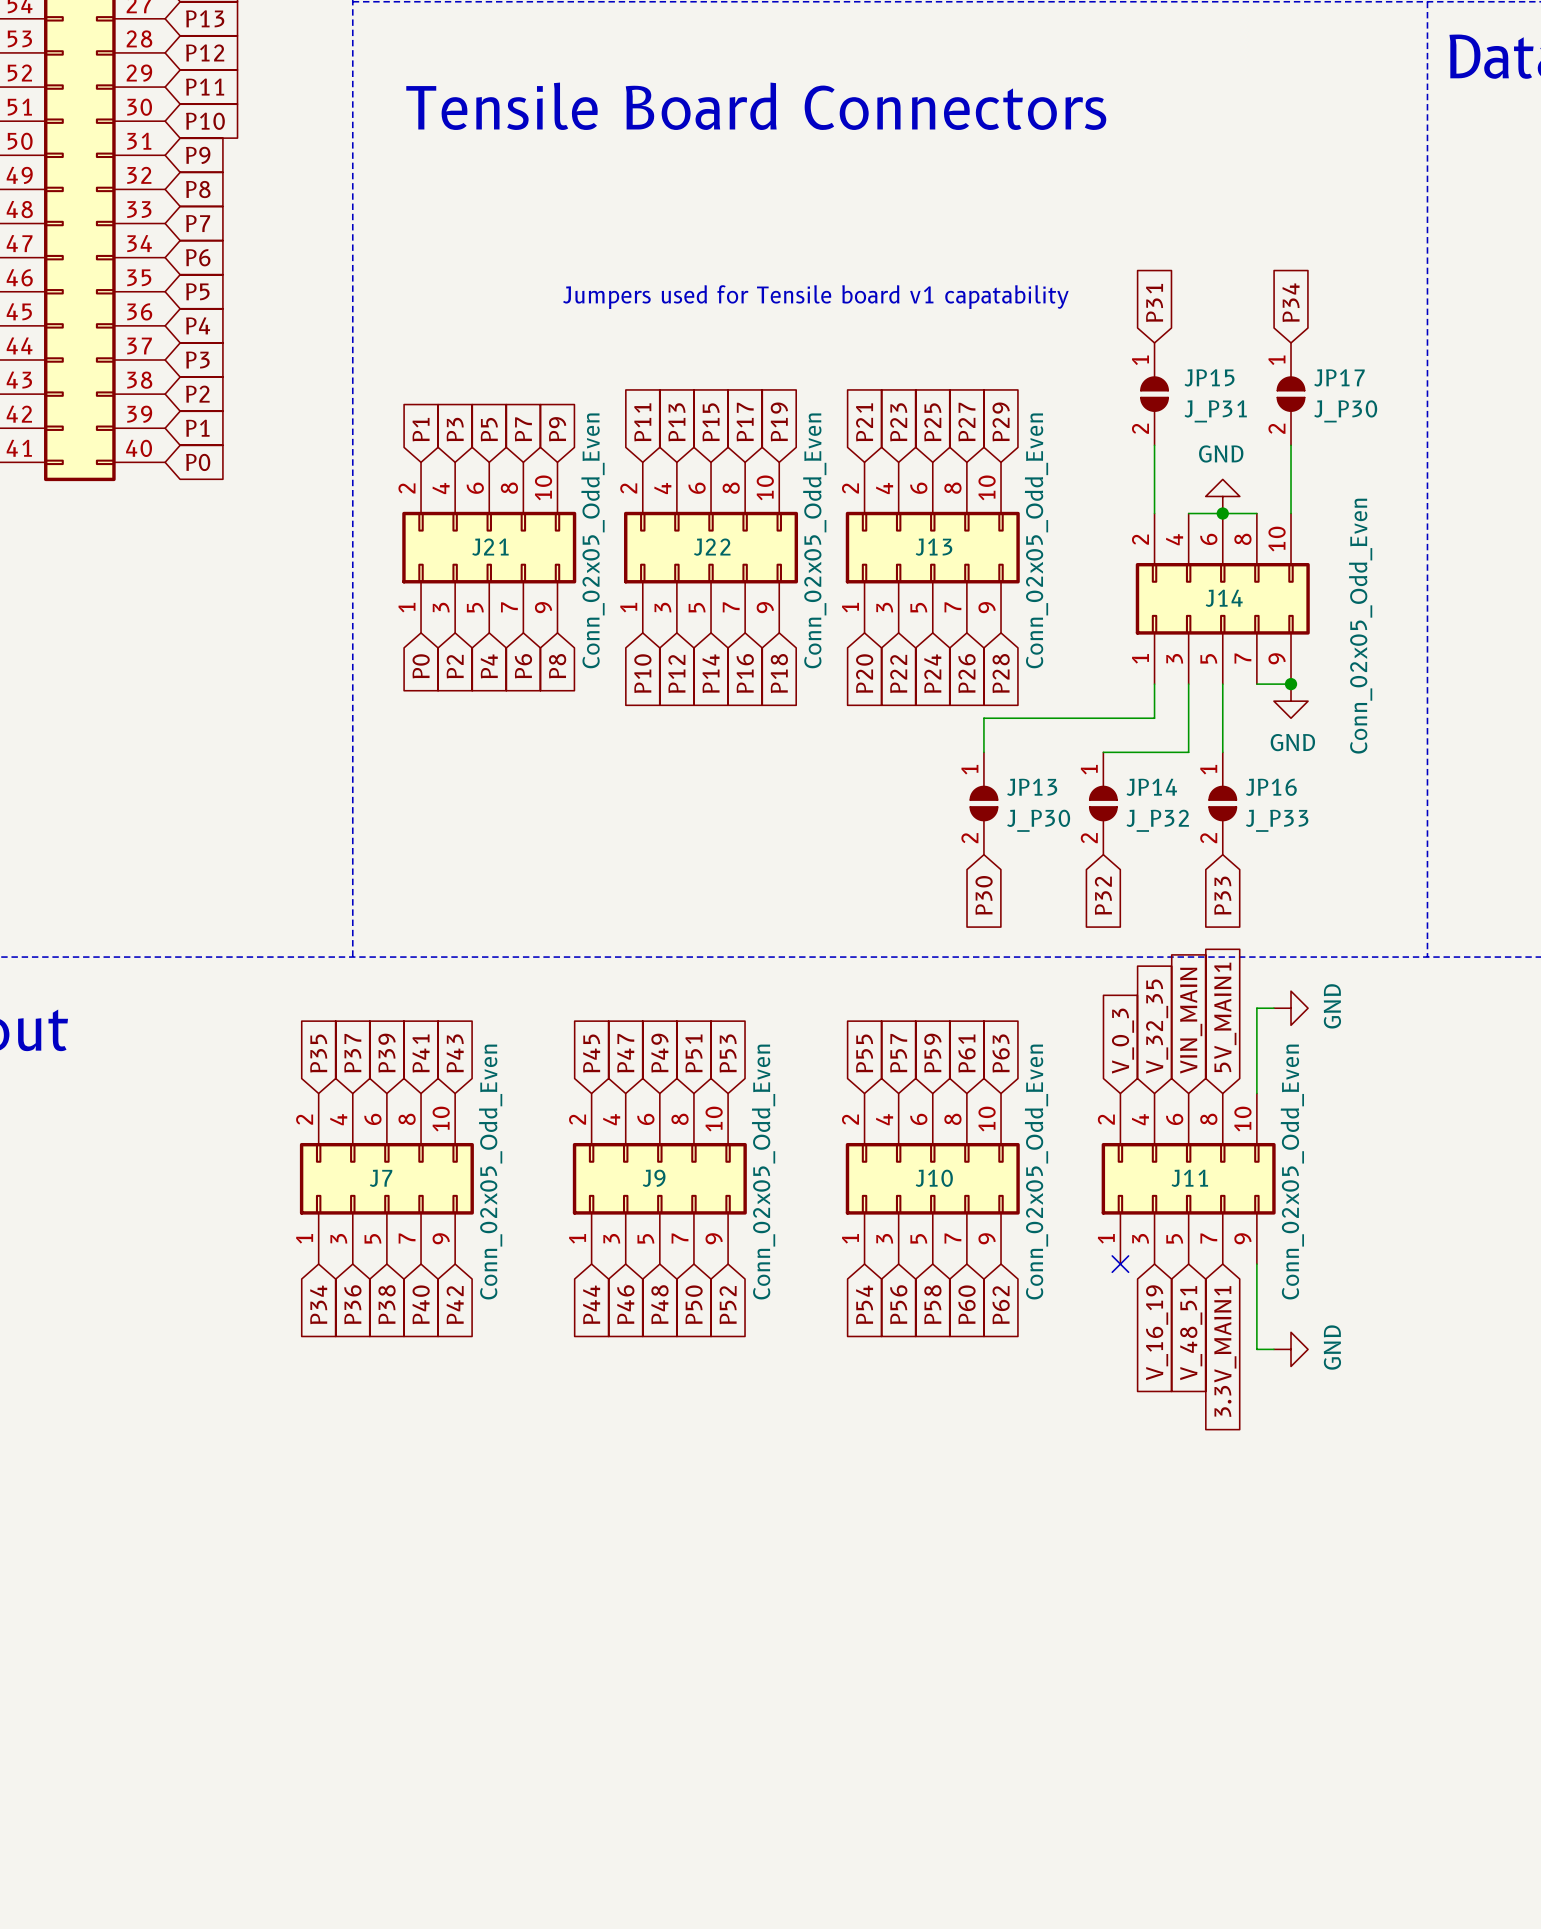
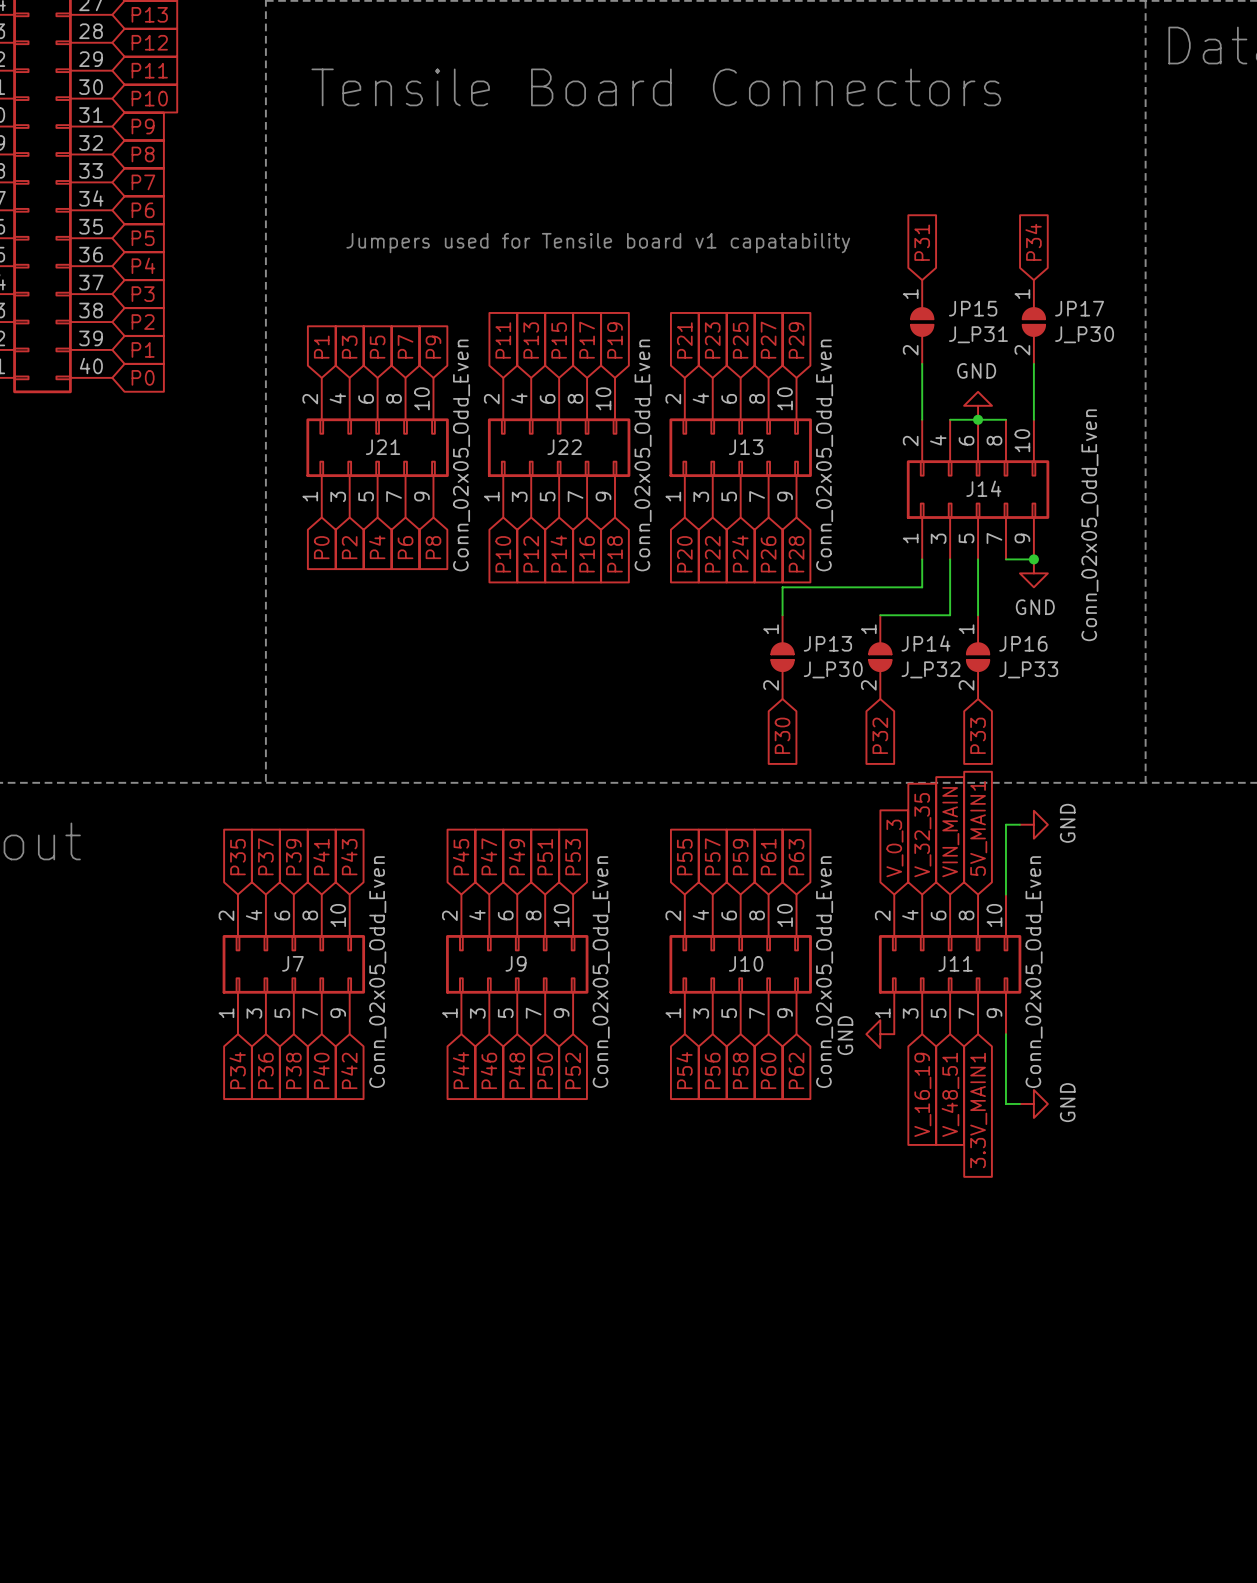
power symbol: none -> GND (880, 1034)
no-connect mark: (1120, 1264) -> none

